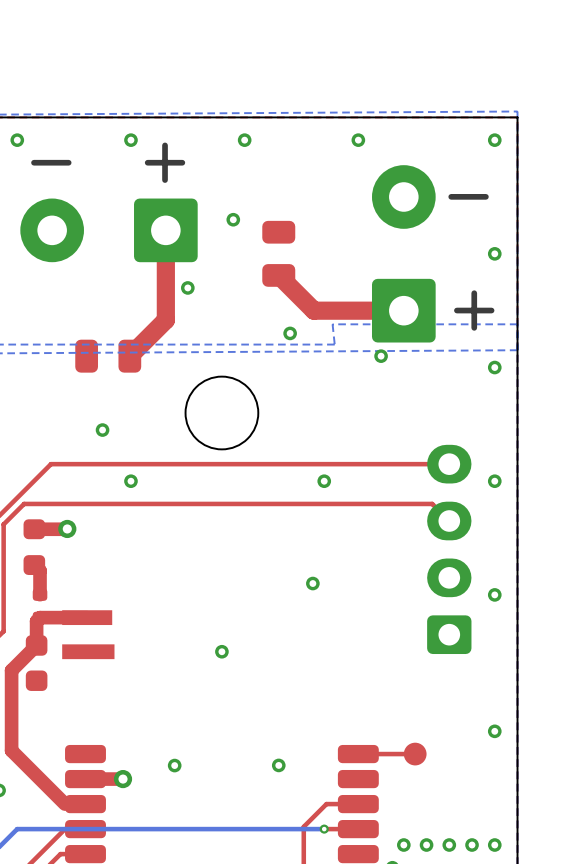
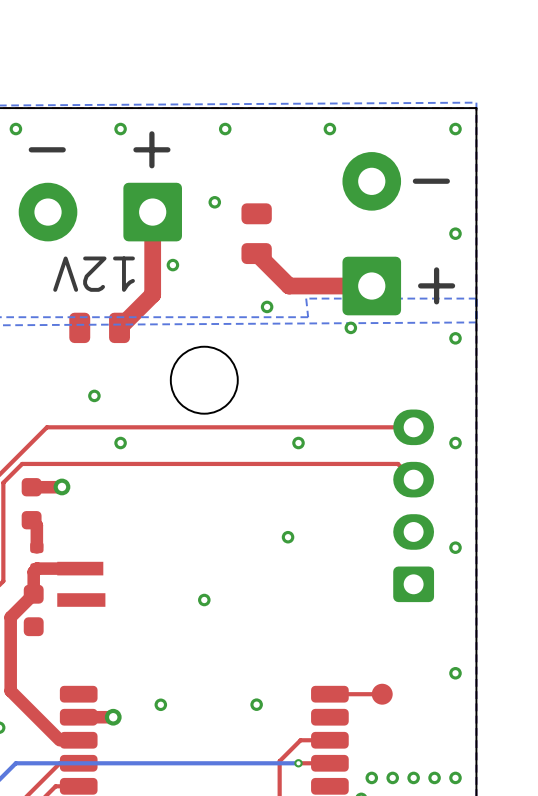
text: none -> 12V (94, 274)

